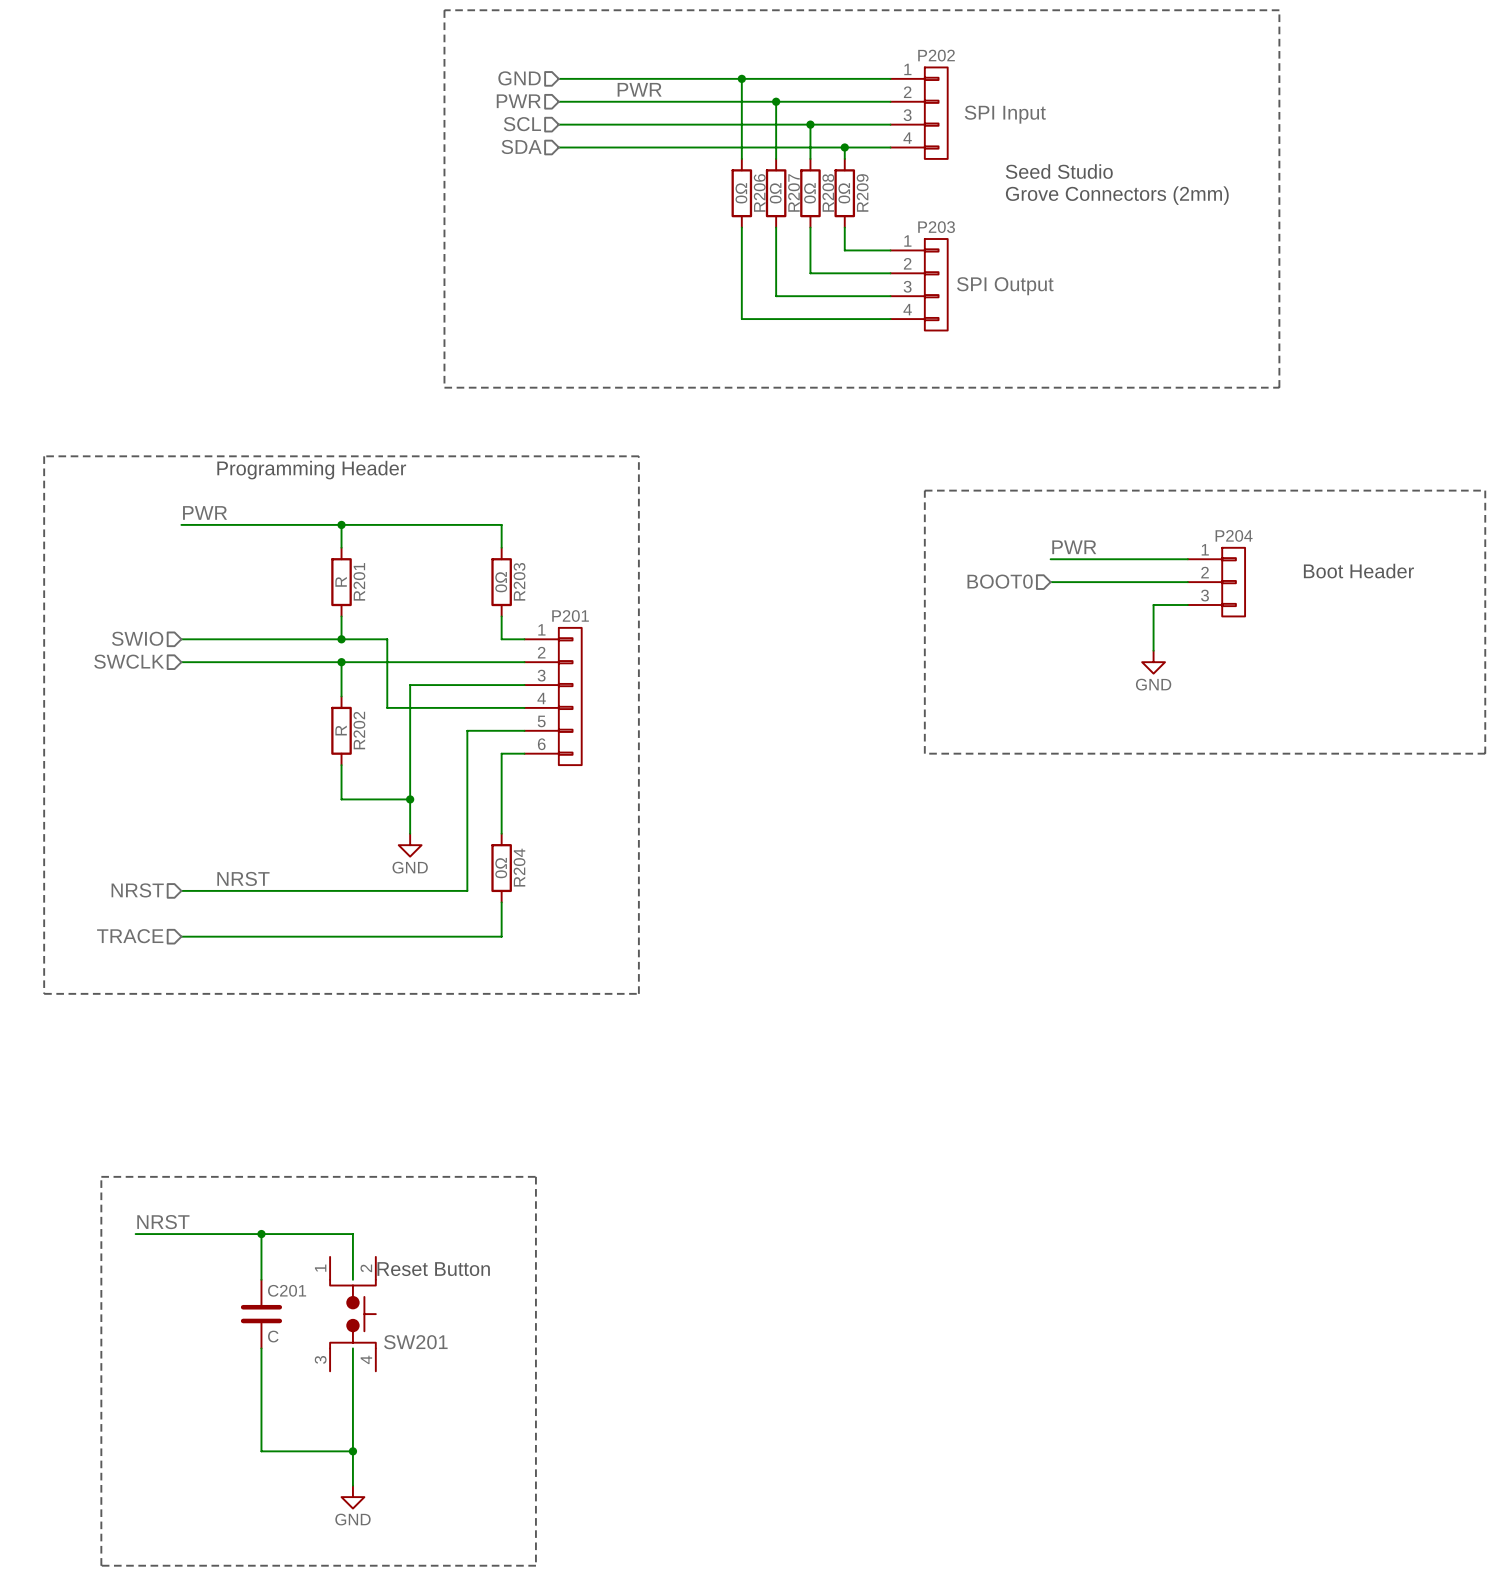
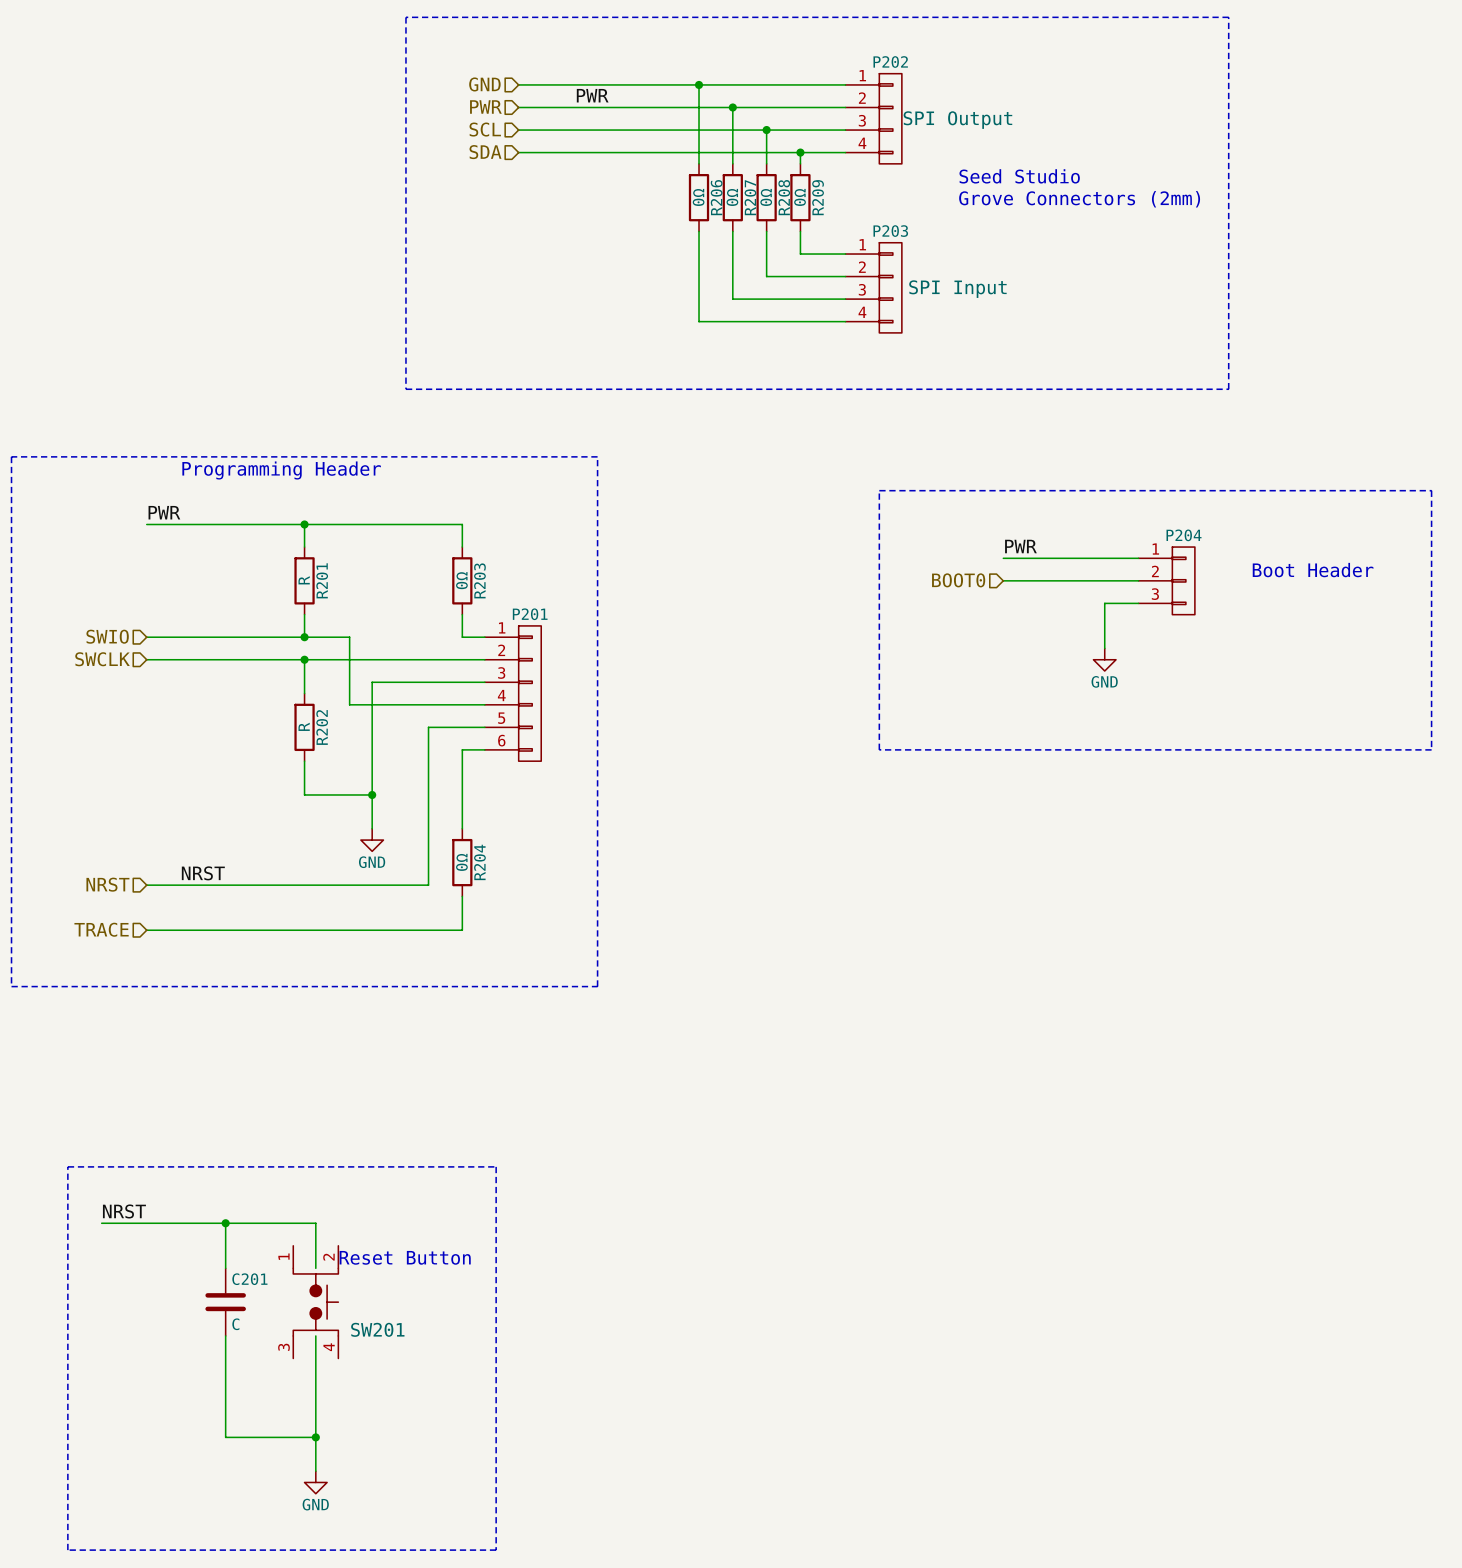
P202 text: SPI Input (1005, 114) -> SPI Output (957, 120)
P203 text: SPI Output (1005, 286) -> SPI Input (957, 289)

